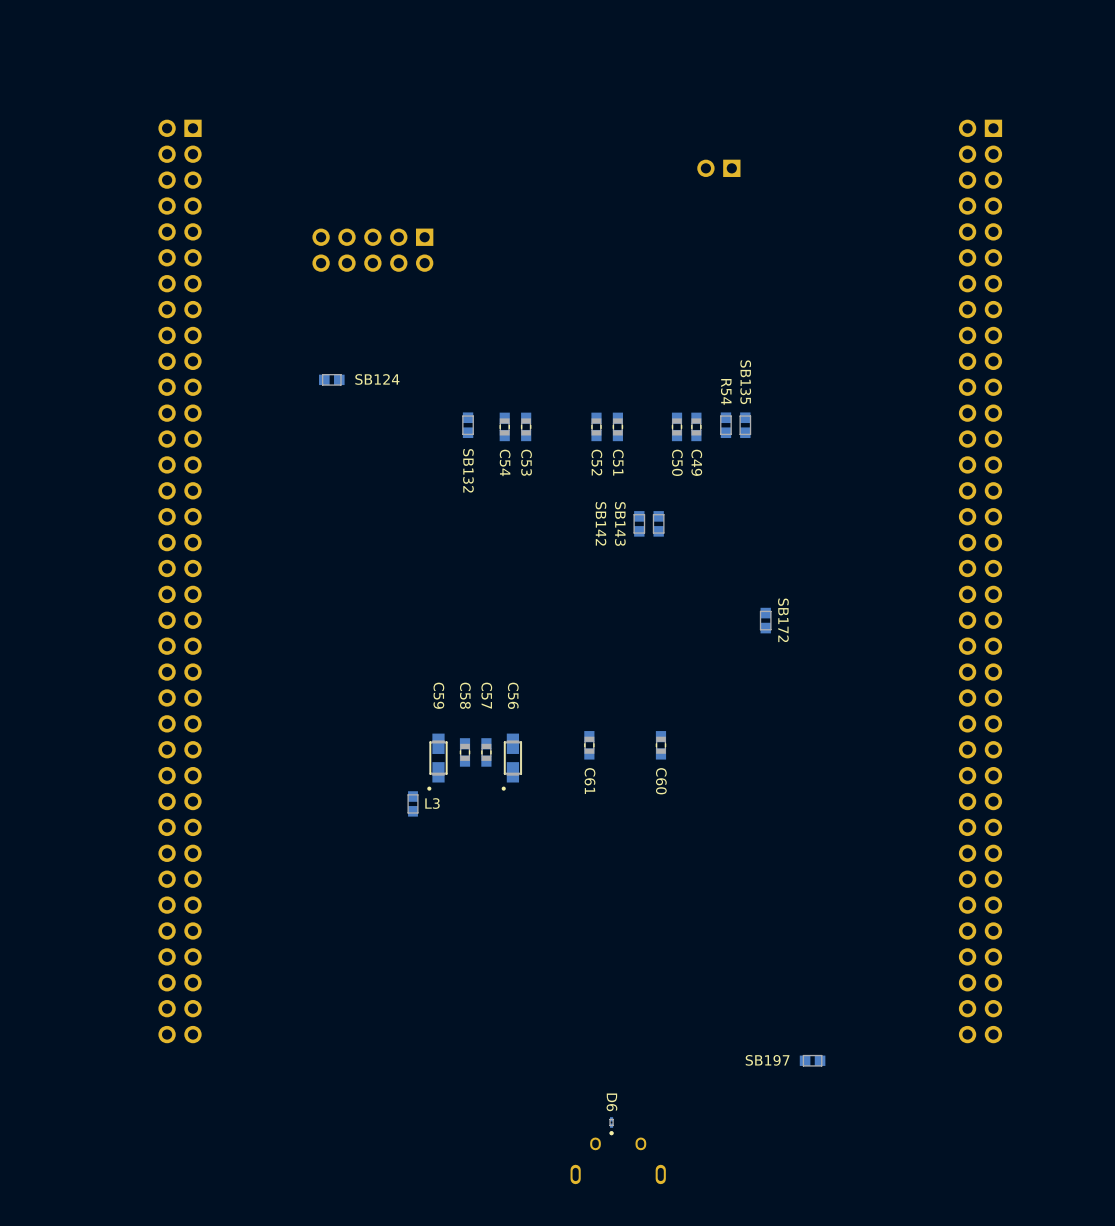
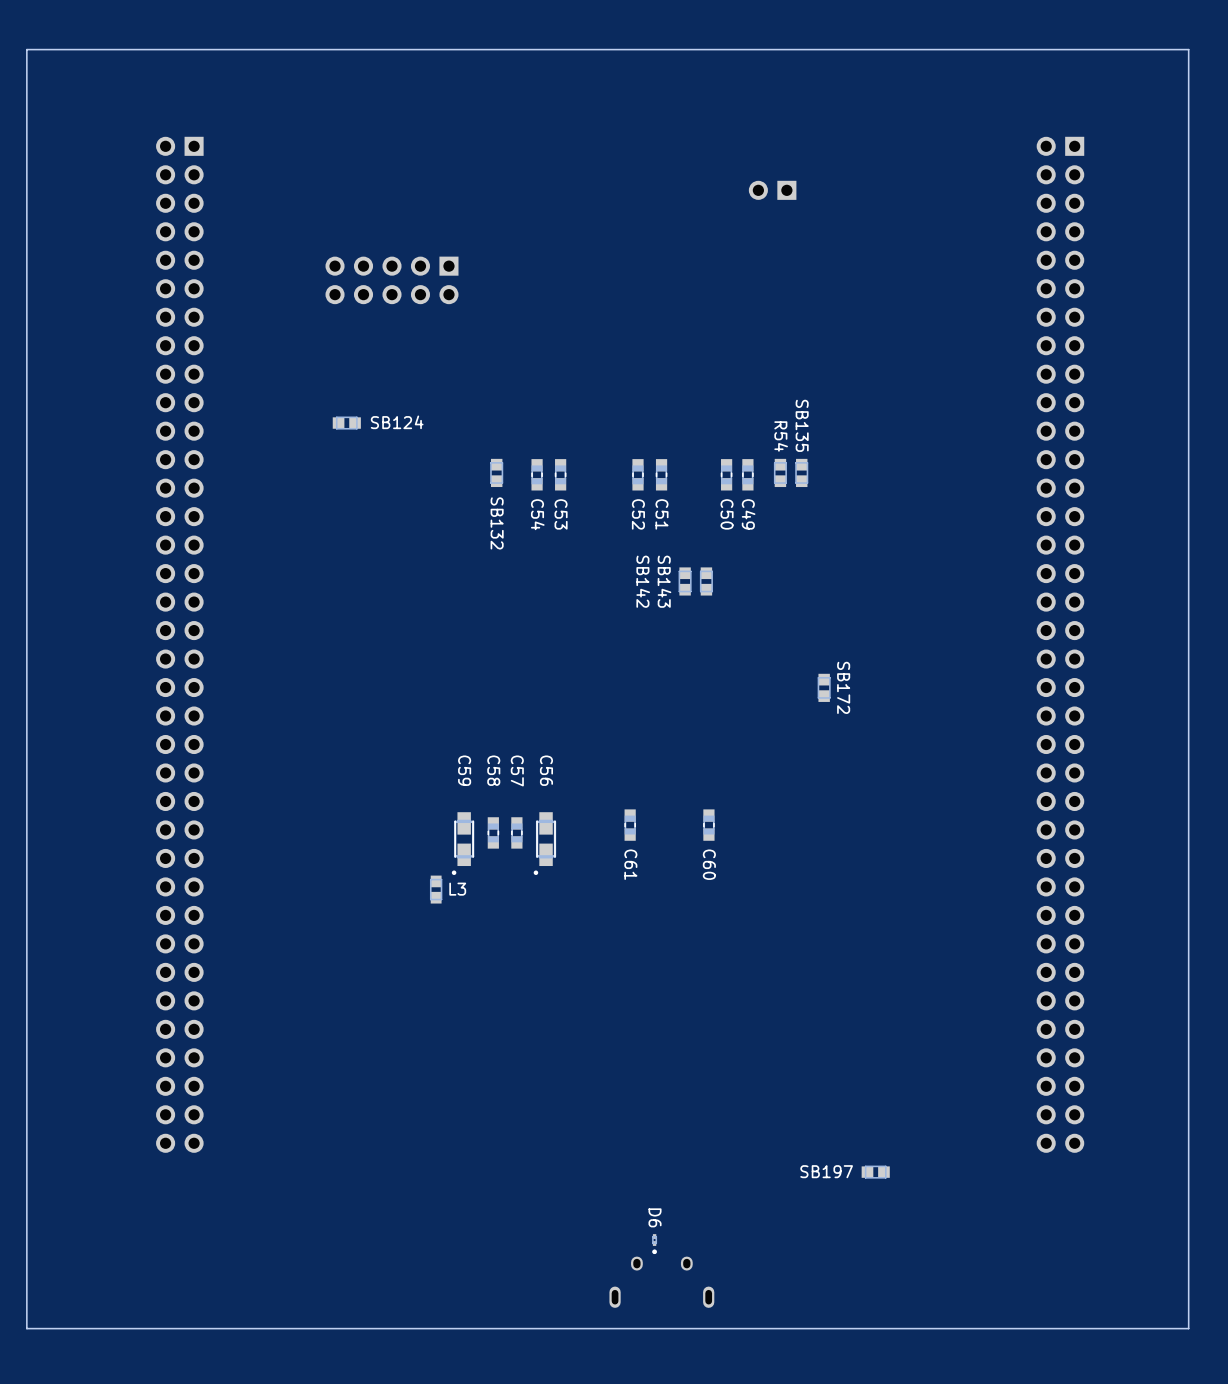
board edge: none -> (1188, 49) (26, 49) (26, 1328) (1188, 1328) (1188, 49)

